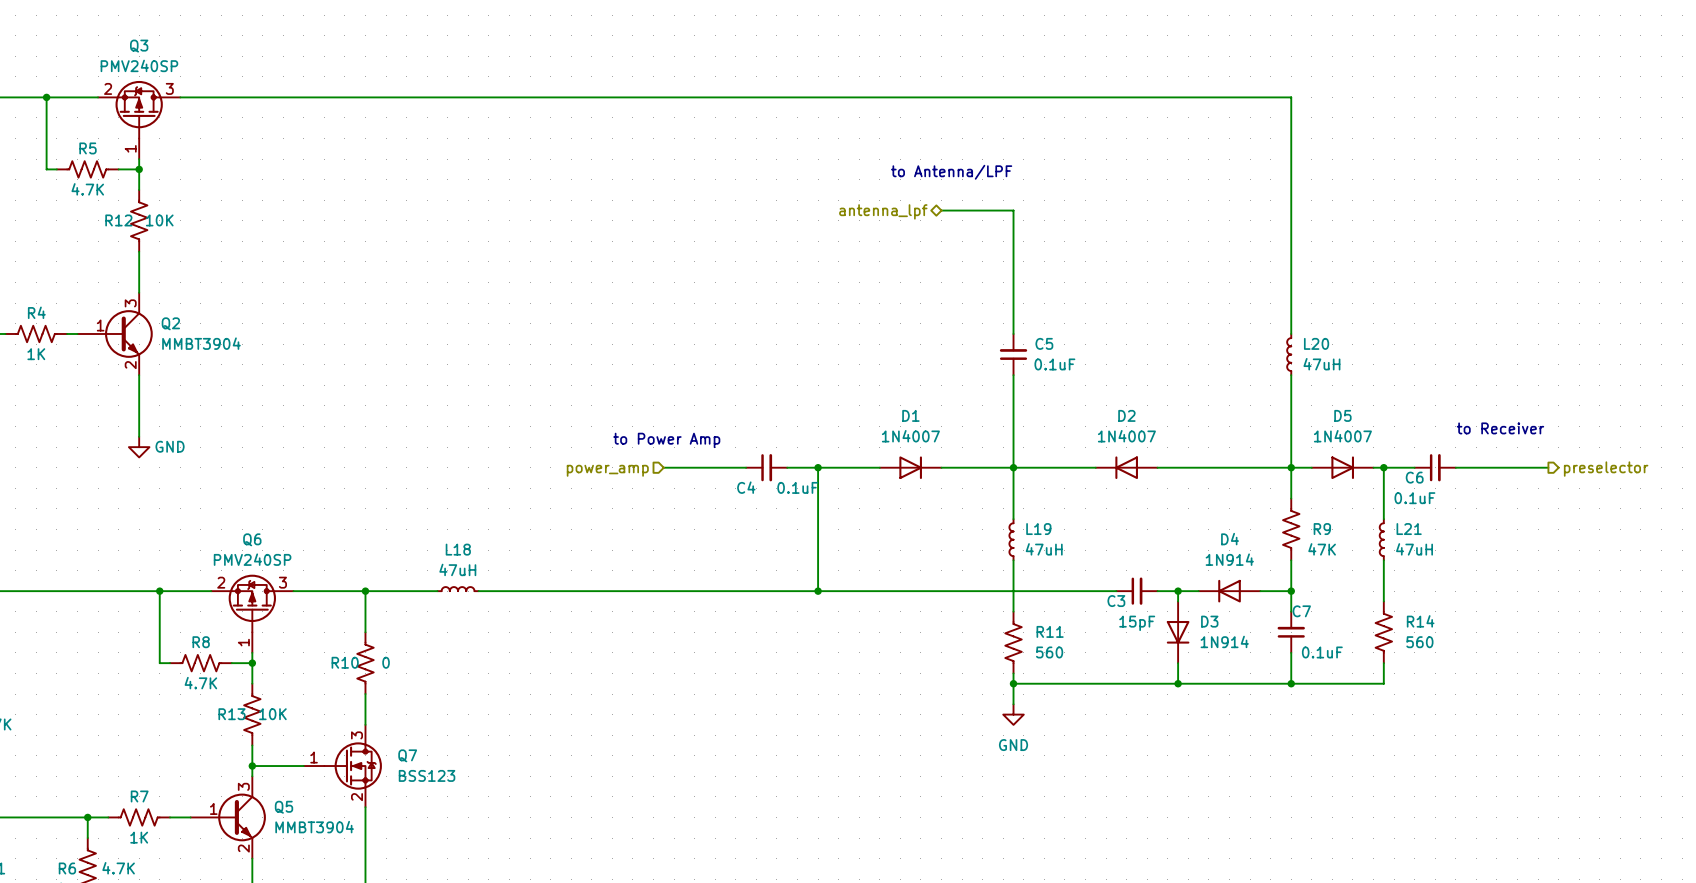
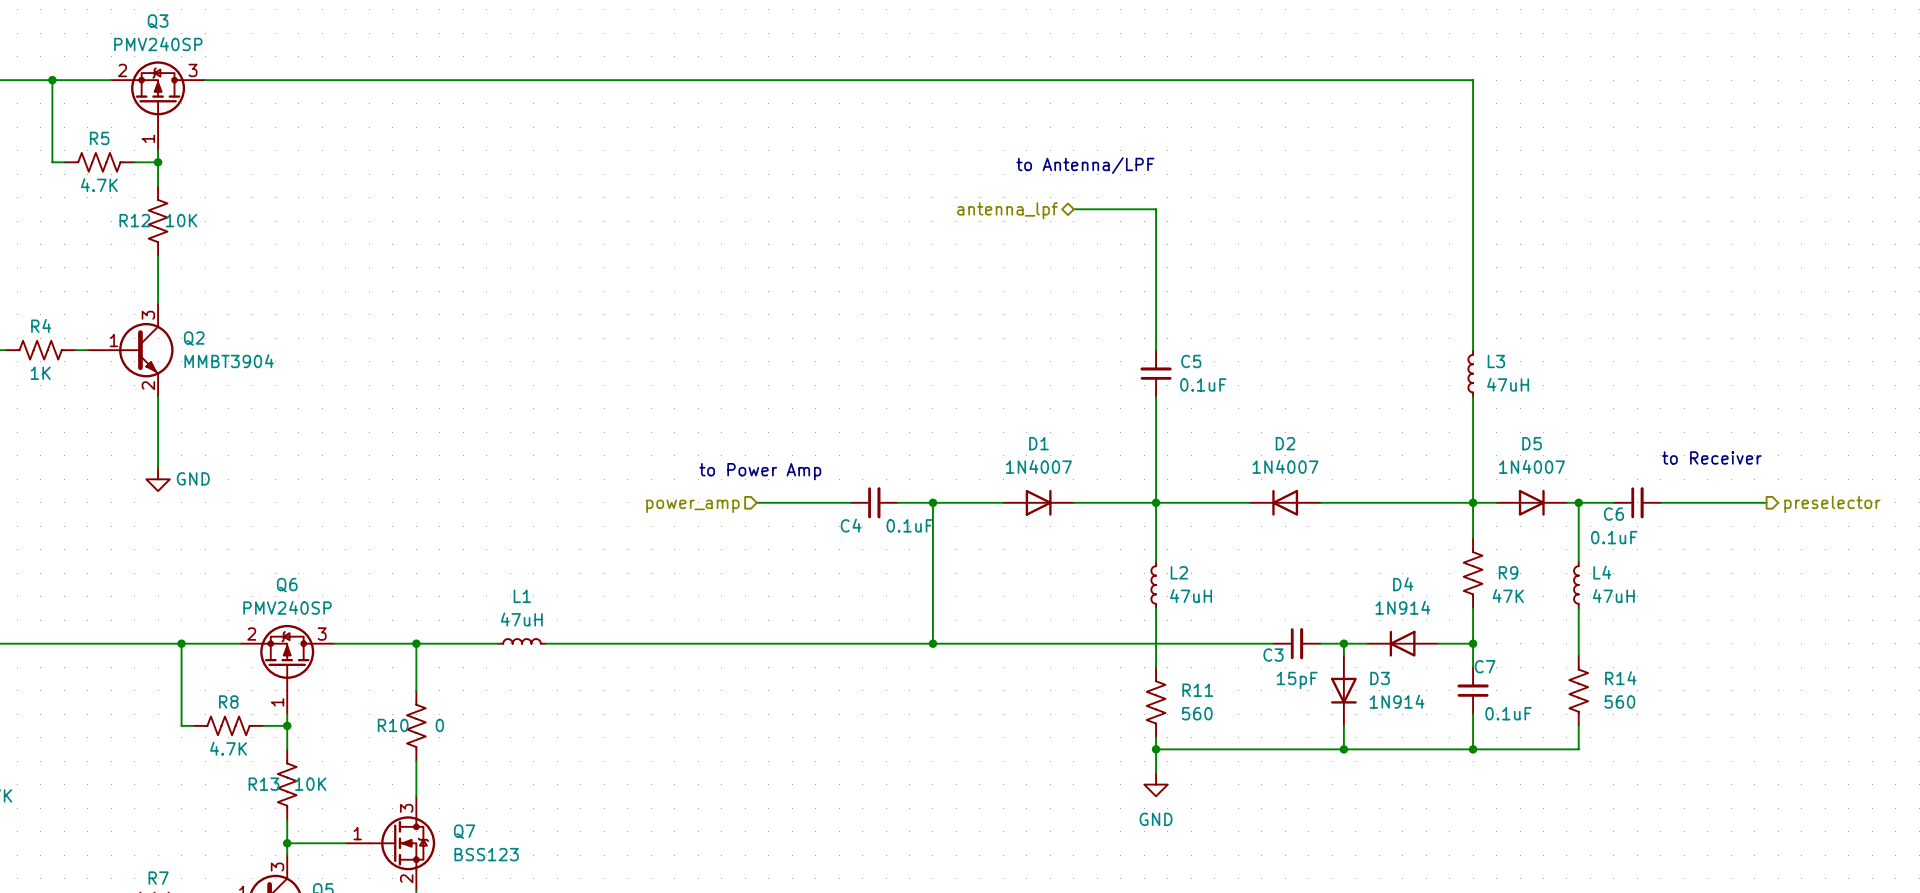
L20 name: L20 (1316, 343) -> L3 (1496, 361)
L19 name: L19 (1038, 529) -> L2 (1179, 572)
L21 name: L21 (1409, 529) -> L4 (1602, 572)
L18 name: L18 (458, 549) -> L1 (522, 596)

